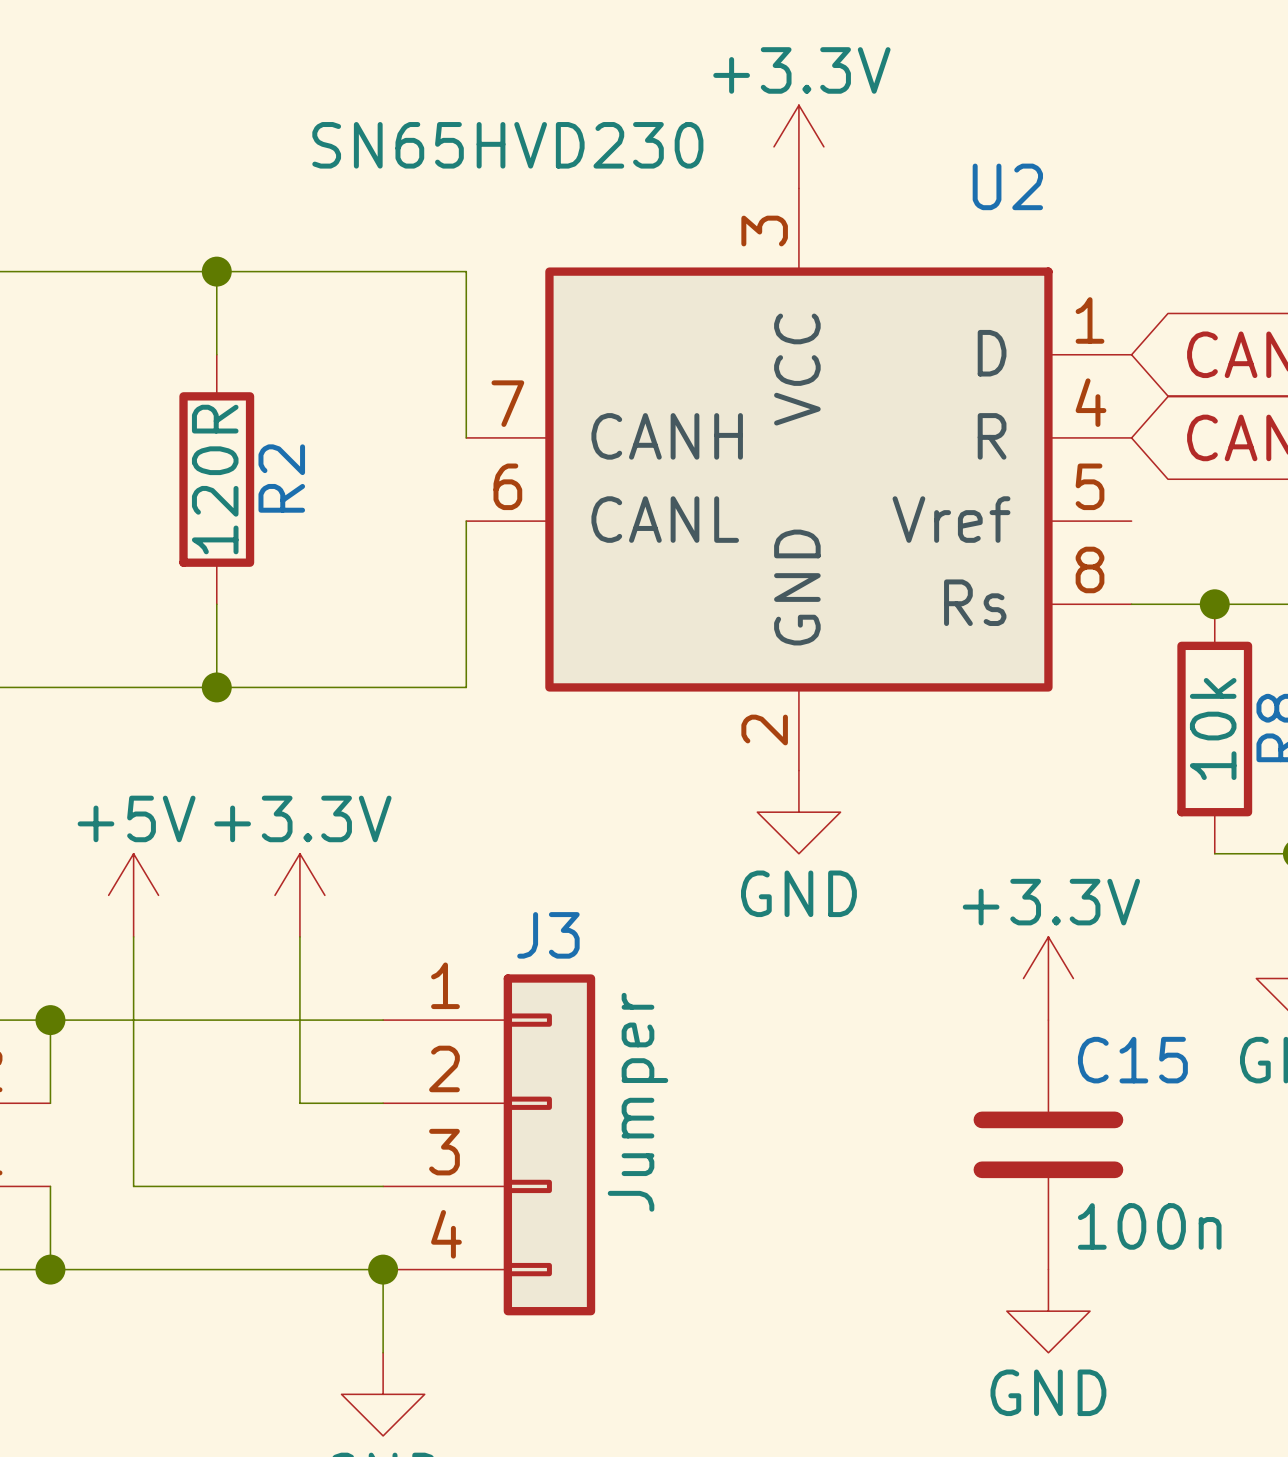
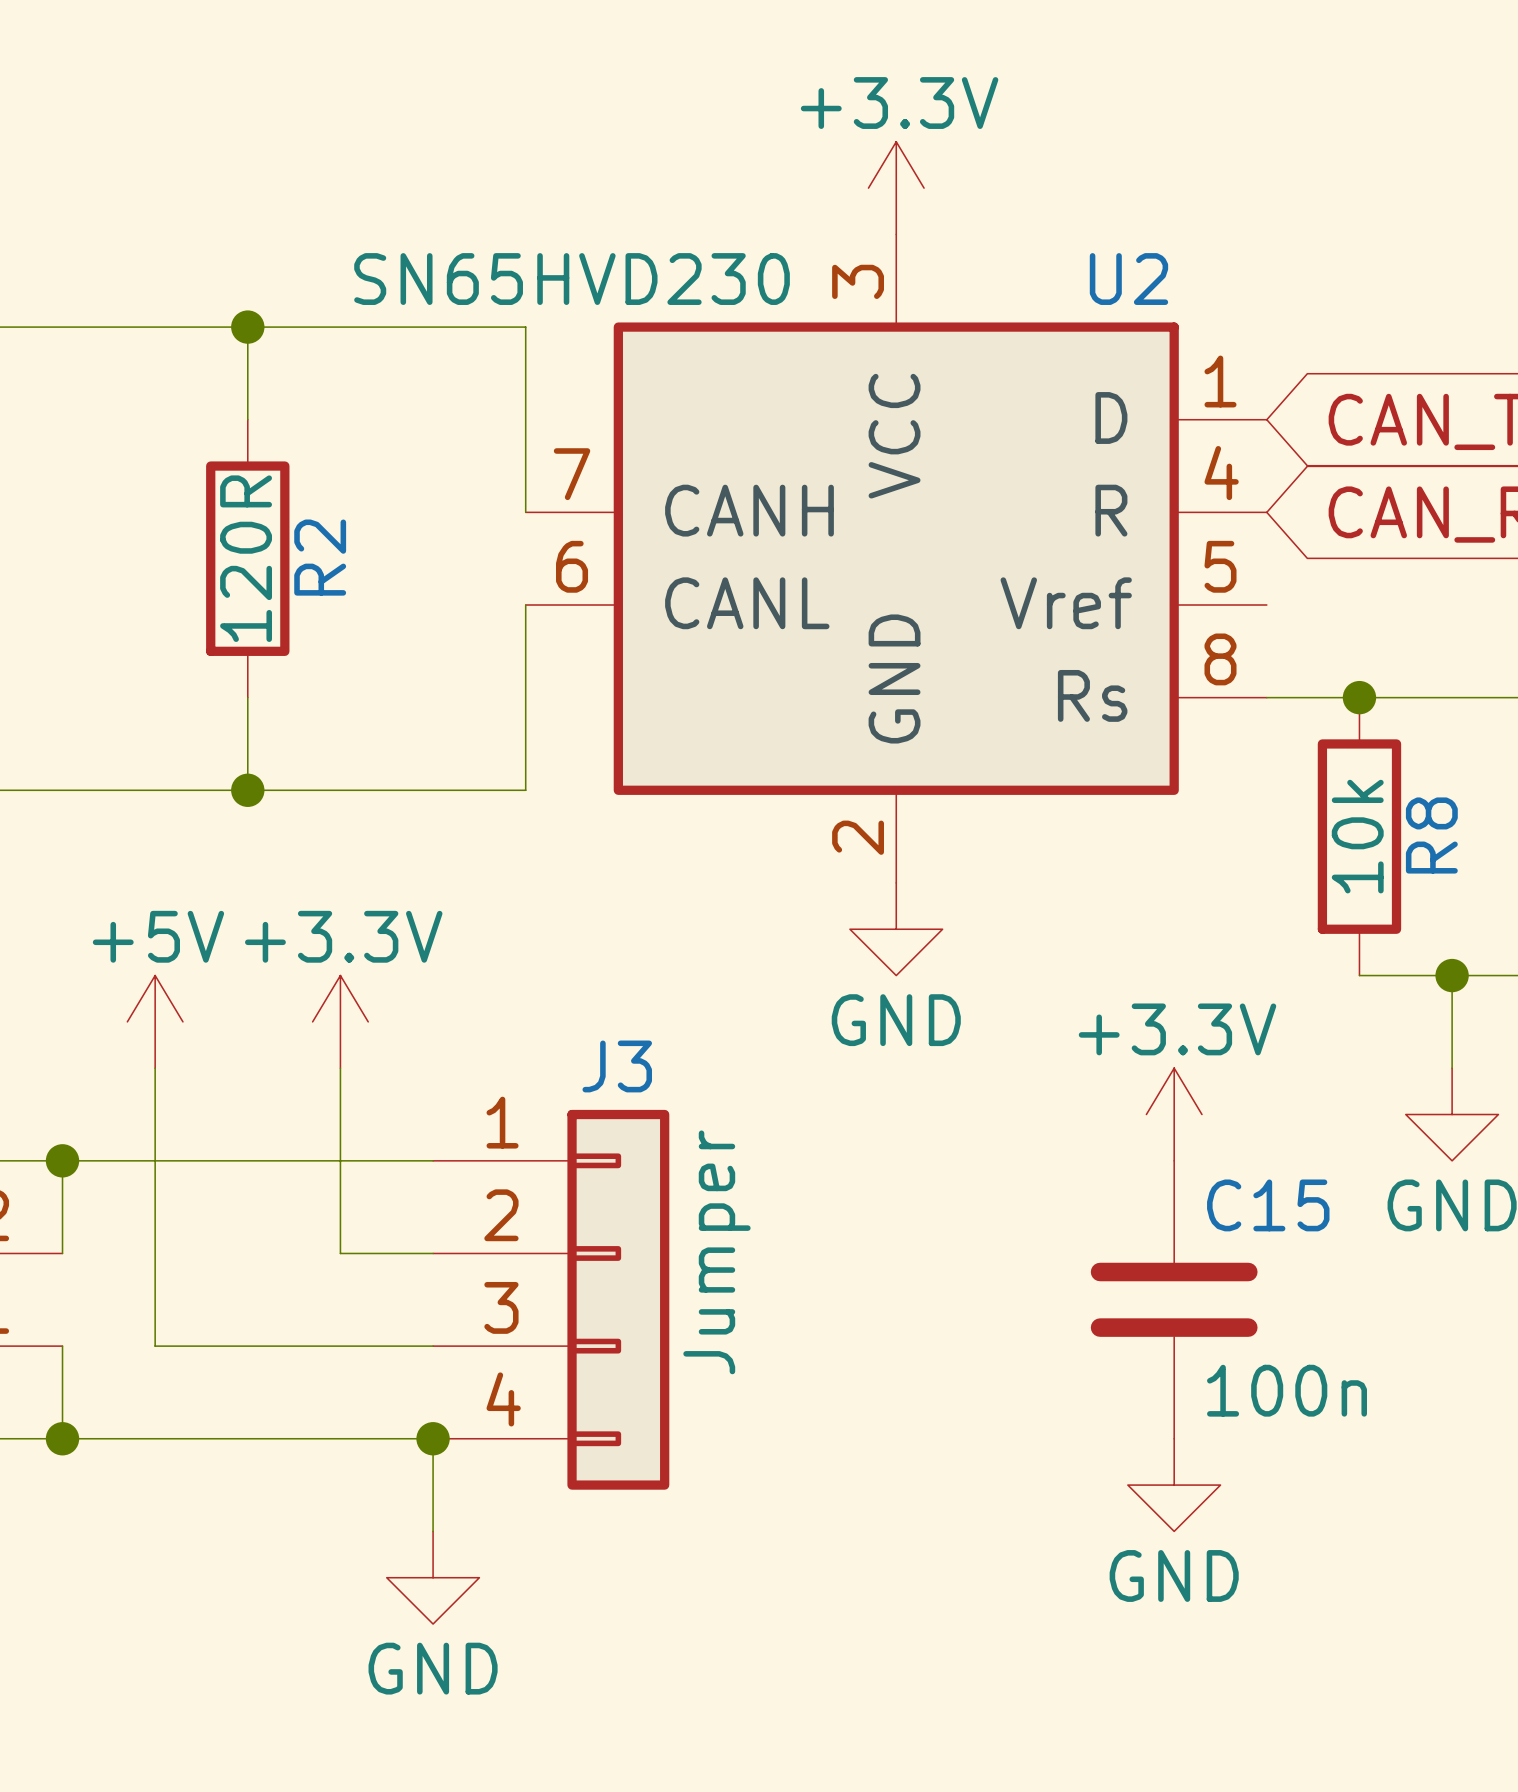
U2 value position: SN65HVD230 (507, 145) -> SN65HVD230 (572, 279)
U2 name position: U2 (1007, 186) -> U2 (1128, 279)

